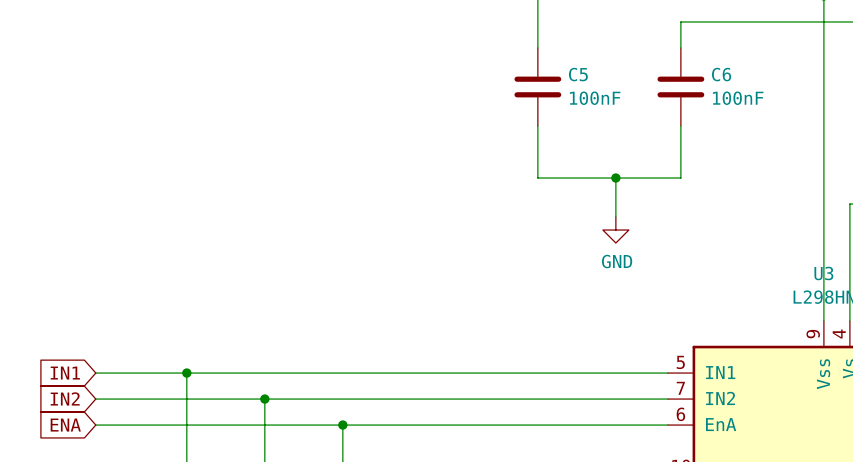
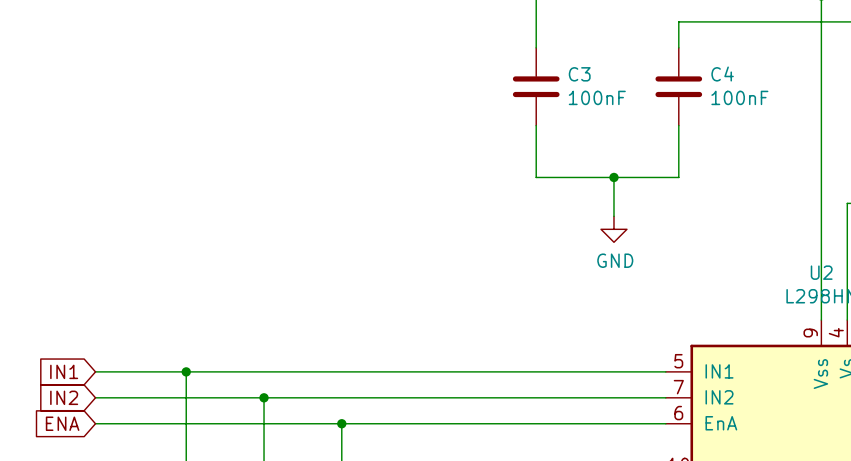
C5 name: C5 (578, 74) -> C3 (579, 74)
C6 name: C6 (721, 74) -> C4 (722, 74)
U3 name: U3 (823, 273) -> U2 (821, 272)

